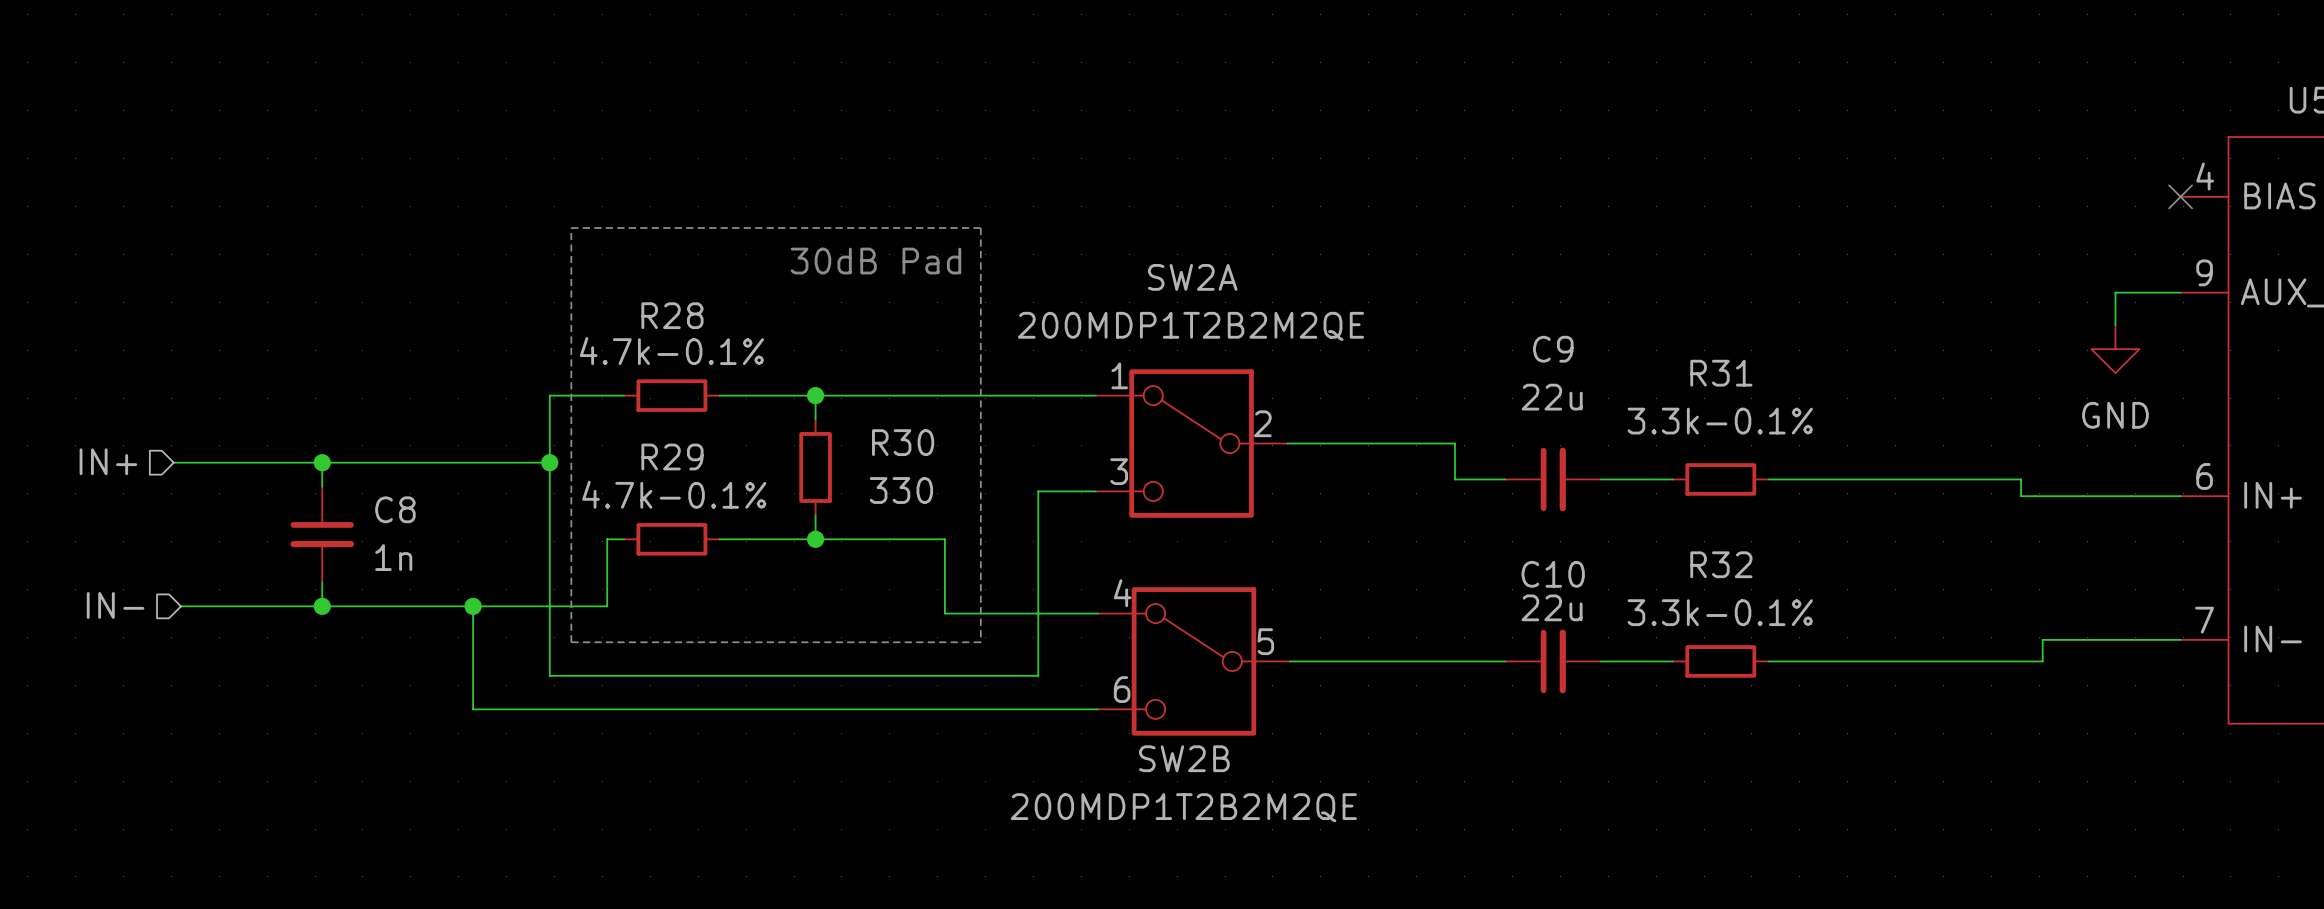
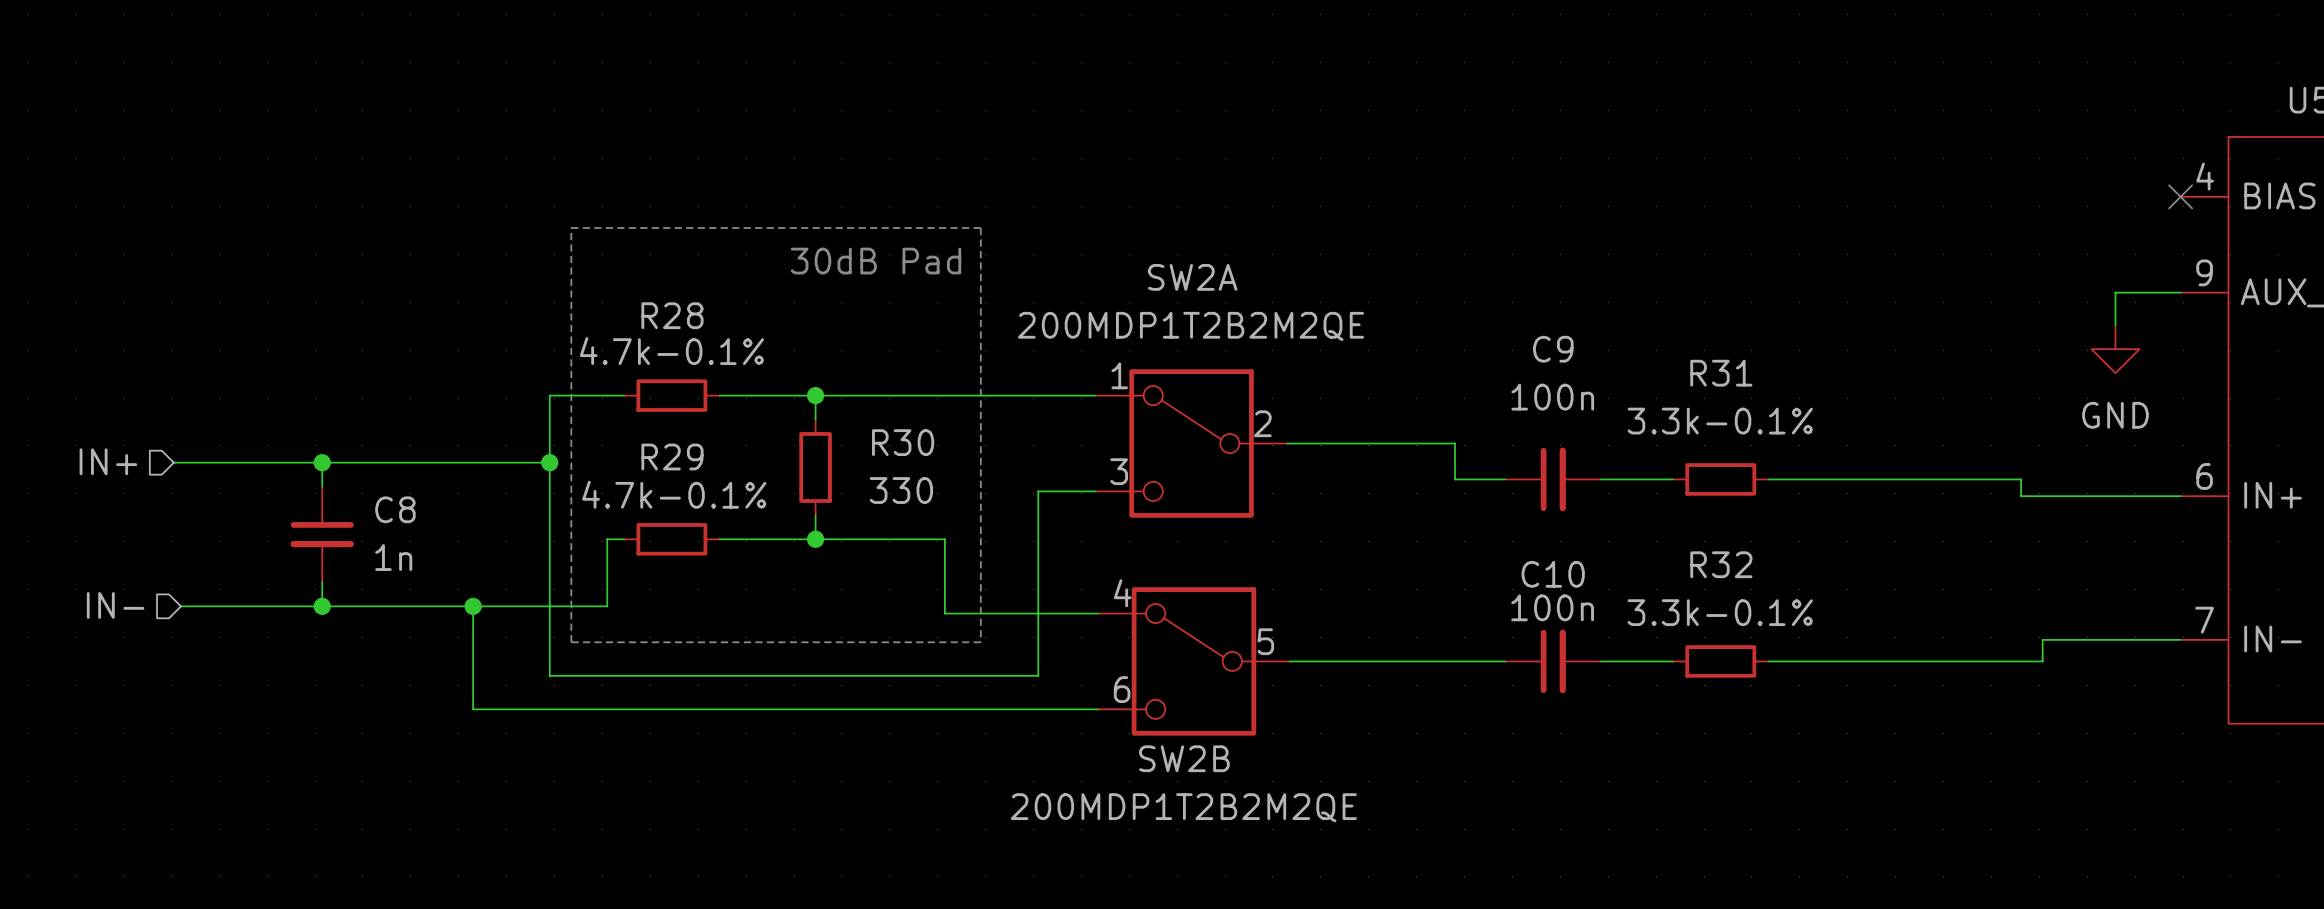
C9 value: 22u (1552, 397) -> 100n (1552, 397)
C10 value: 22u (1552, 607) -> 100n (1552, 607)

